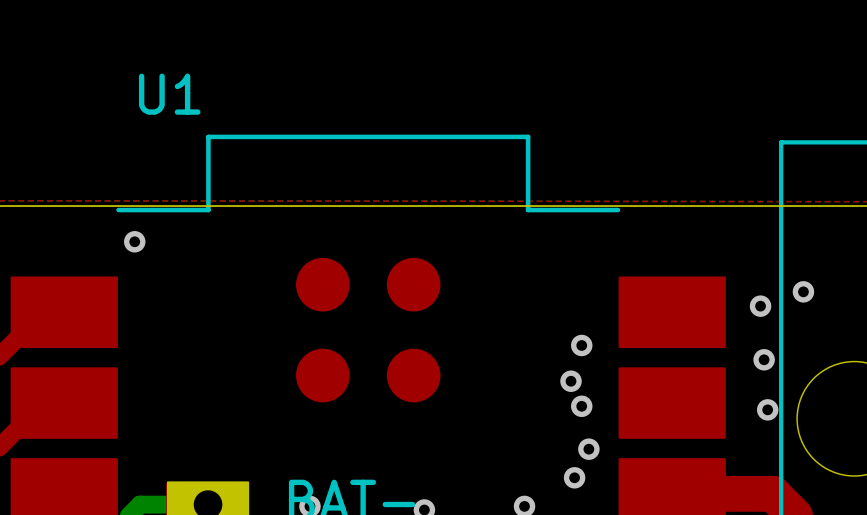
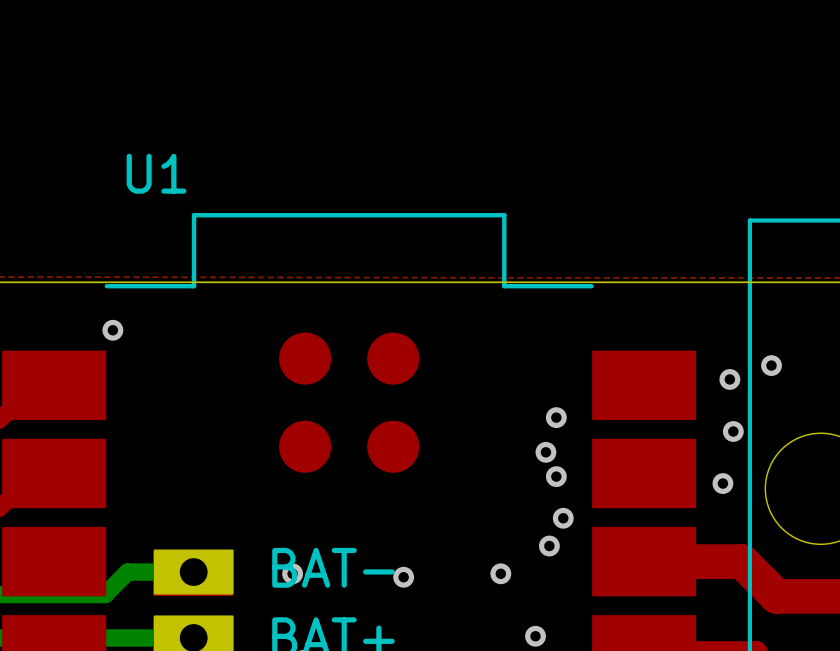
via position: (134, 241) -> (112, 330)
via position: (767, 409) -> (722, 483)

